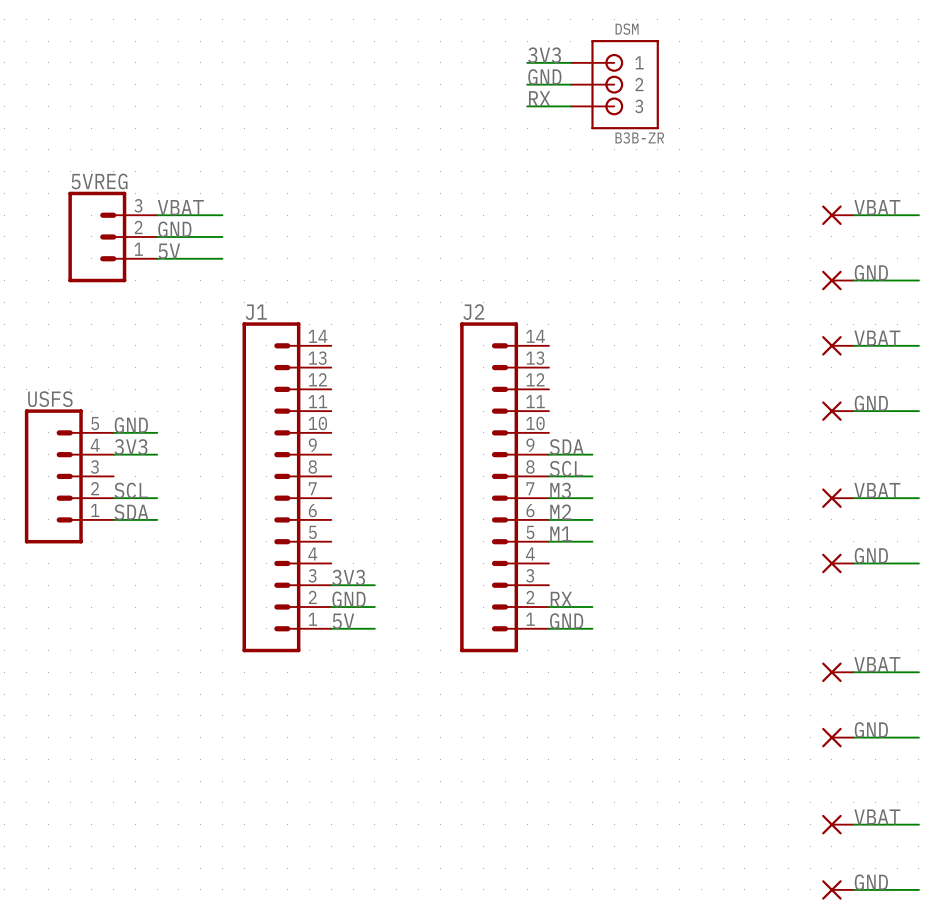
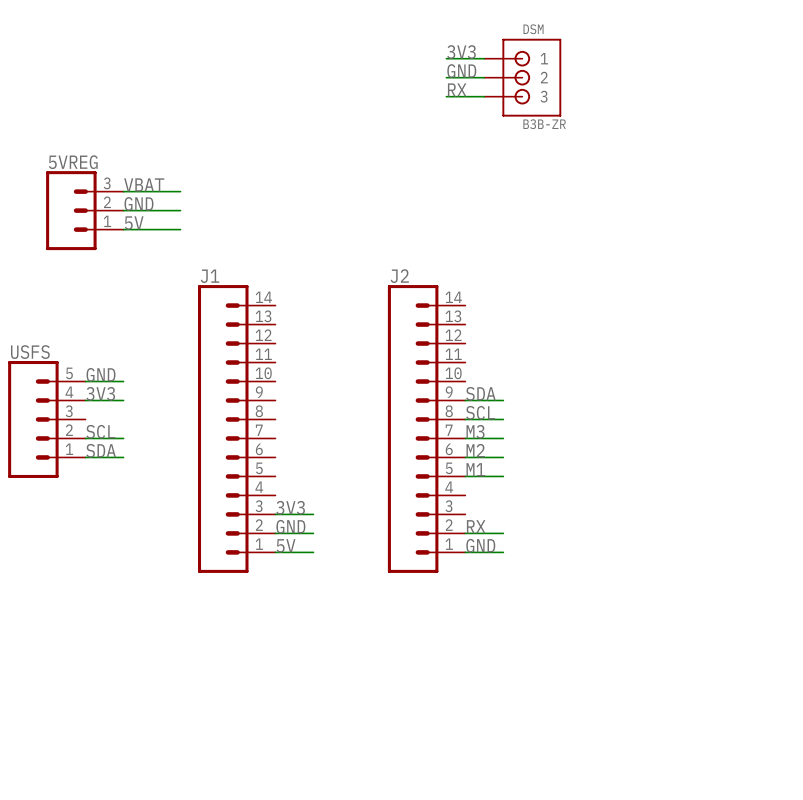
label: VBAT (877, 207) -> none
part: (837, 215) -> none
wire: (853, 215) (918, 215) -> none
label: GND (871, 272) -> none
part: (837, 280) -> none
wire: (853, 280) (918, 280) -> none
label: VBAT (877, 338) -> none
part: (837, 345) -> none
wire: (853, 345) (918, 345) -> none
label: GND (871, 403) -> none
part: (837, 411) -> none
wire: (853, 411) (918, 411) -> none
label: VBAT (877, 490) -> none
part: (837, 498) -> none
wire: (853, 498) (918, 498) -> none
label: GND (871, 555) -> none
part: (837, 563) -> none
wire: (853, 563) (918, 563) -> none
label: VBAT (877, 664) -> none
part: (837, 672) -> none
wire: (853, 672) (918, 672) -> none
label: GND (871, 729) -> none
part: (837, 737) -> none
wire: (853, 737) (918, 737) -> none
label: VBAT (877, 817) -> none
part: (837, 824) -> none
wire: (853, 824) (918, 824) -> none
label: GND (871, 882) -> none
part: (837, 889) -> none
wire: (853, 889) (918, 889) -> none

